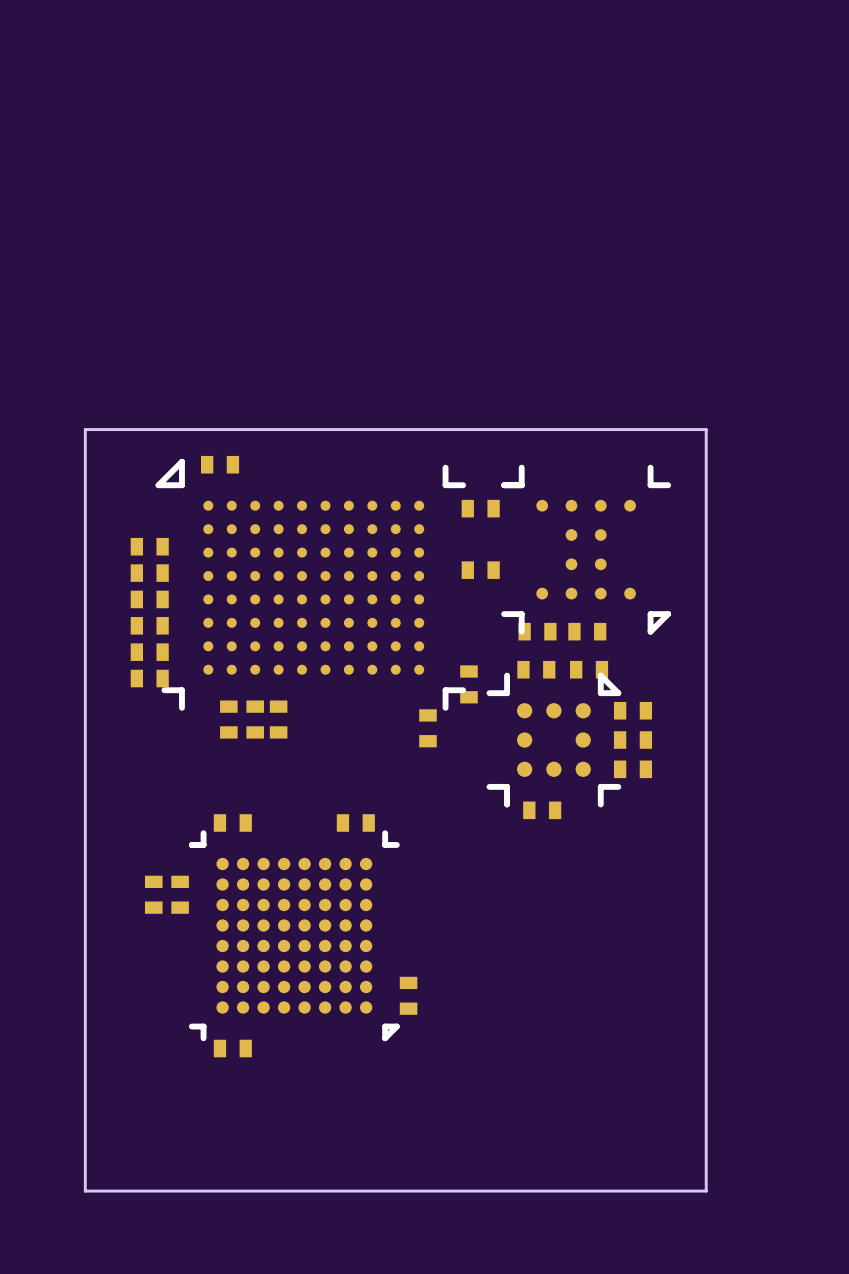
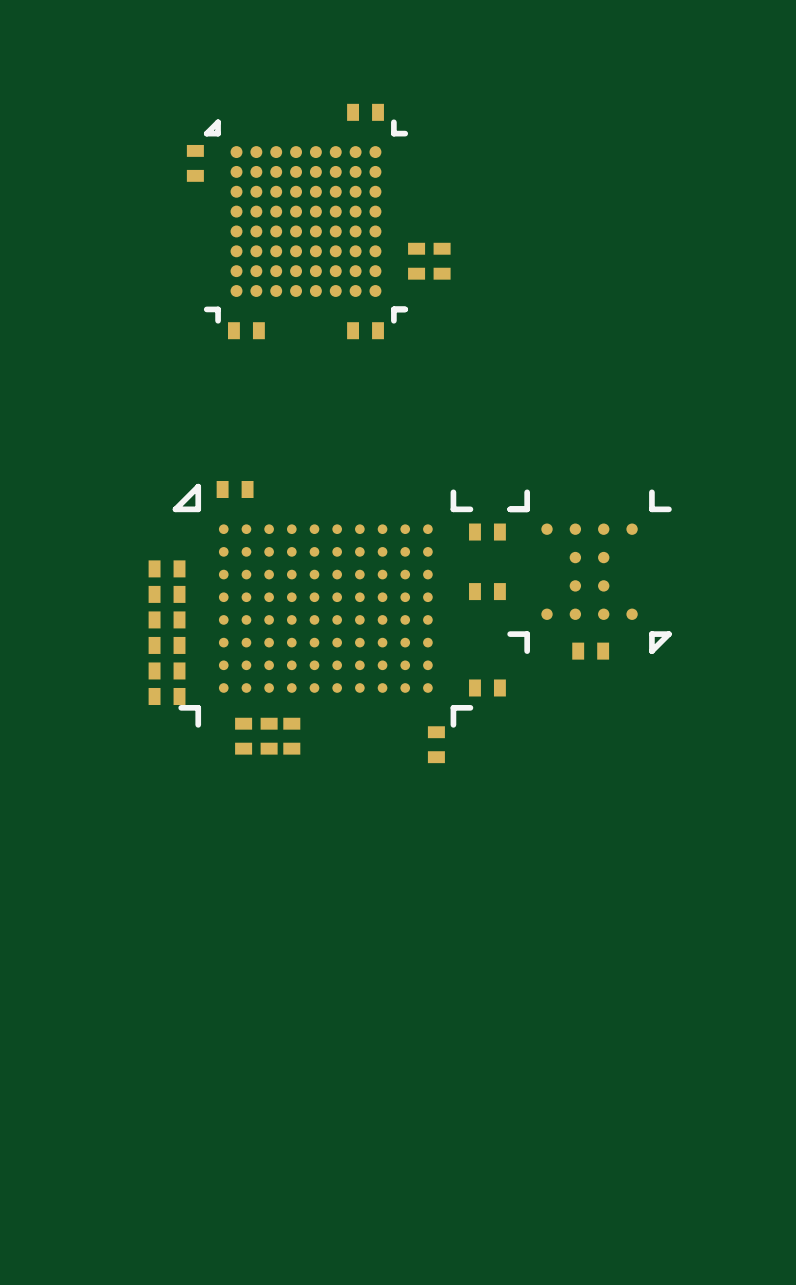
part: none -> (365, 112)
part: none -> (195, 163)
part: none -> (416, 261)
part: none -> (442, 261)
part: none -> (246, 330)
part: none -> (365, 330)
board edge: (85, 429) (706, 429) (706, 1191) (85, 1191) (85, 429) -> none
part: (537, 631) -> none
part: (536, 669) -> none
part: (589, 669) -> none
part rotation: 0° (468, 684) -> 90° clockwise (487, 687)
part: (633, 710) -> none
part: (553, 740) -> none
part: (633, 740) -> none
part: (633, 769) -> none
part: (542, 810) -> none
part: (232, 822) -> none
part: (355, 822) -> none
part: (153, 894) -> none
part: (180, 894) -> none
part rotation: 0° (294, 935) -> 180° (305, 221)
part position: (294, 935) -> (305, 221)
part: (408, 995) -> none
part: (232, 1048) -> none

